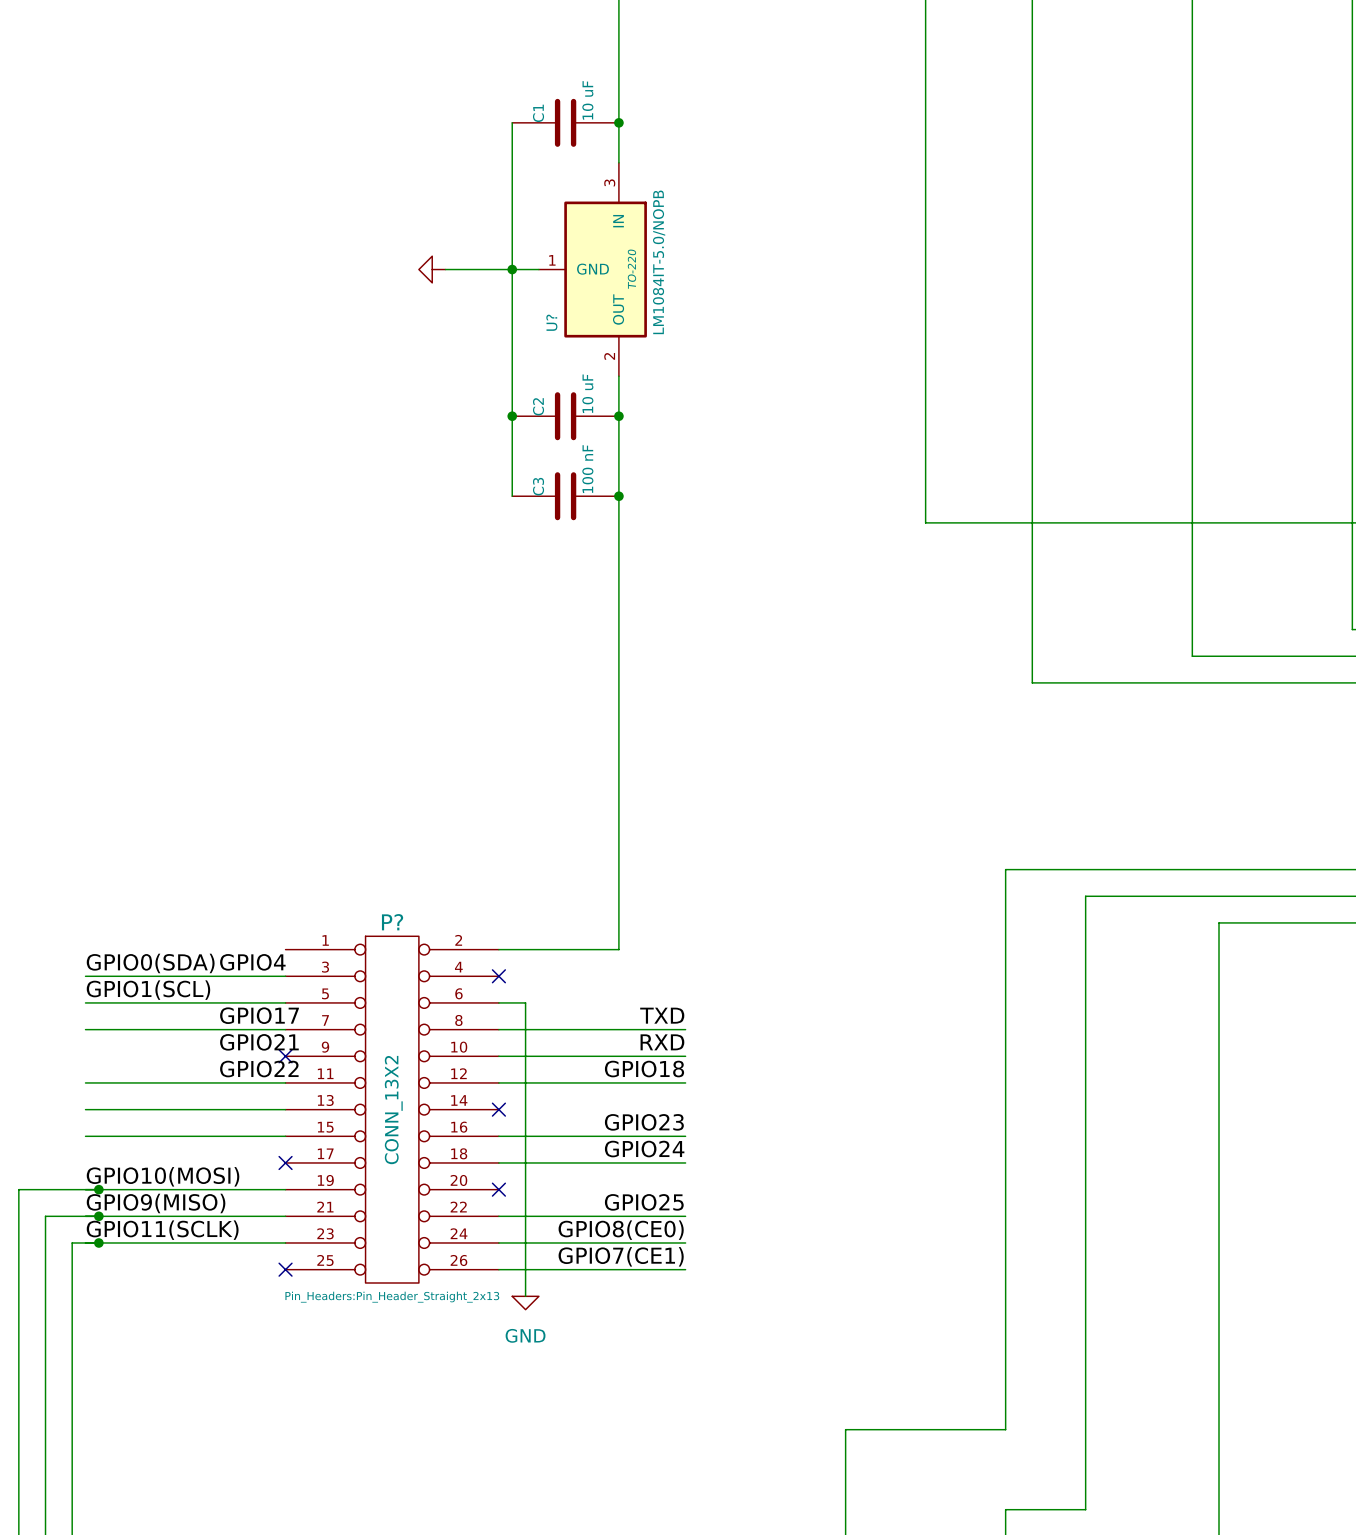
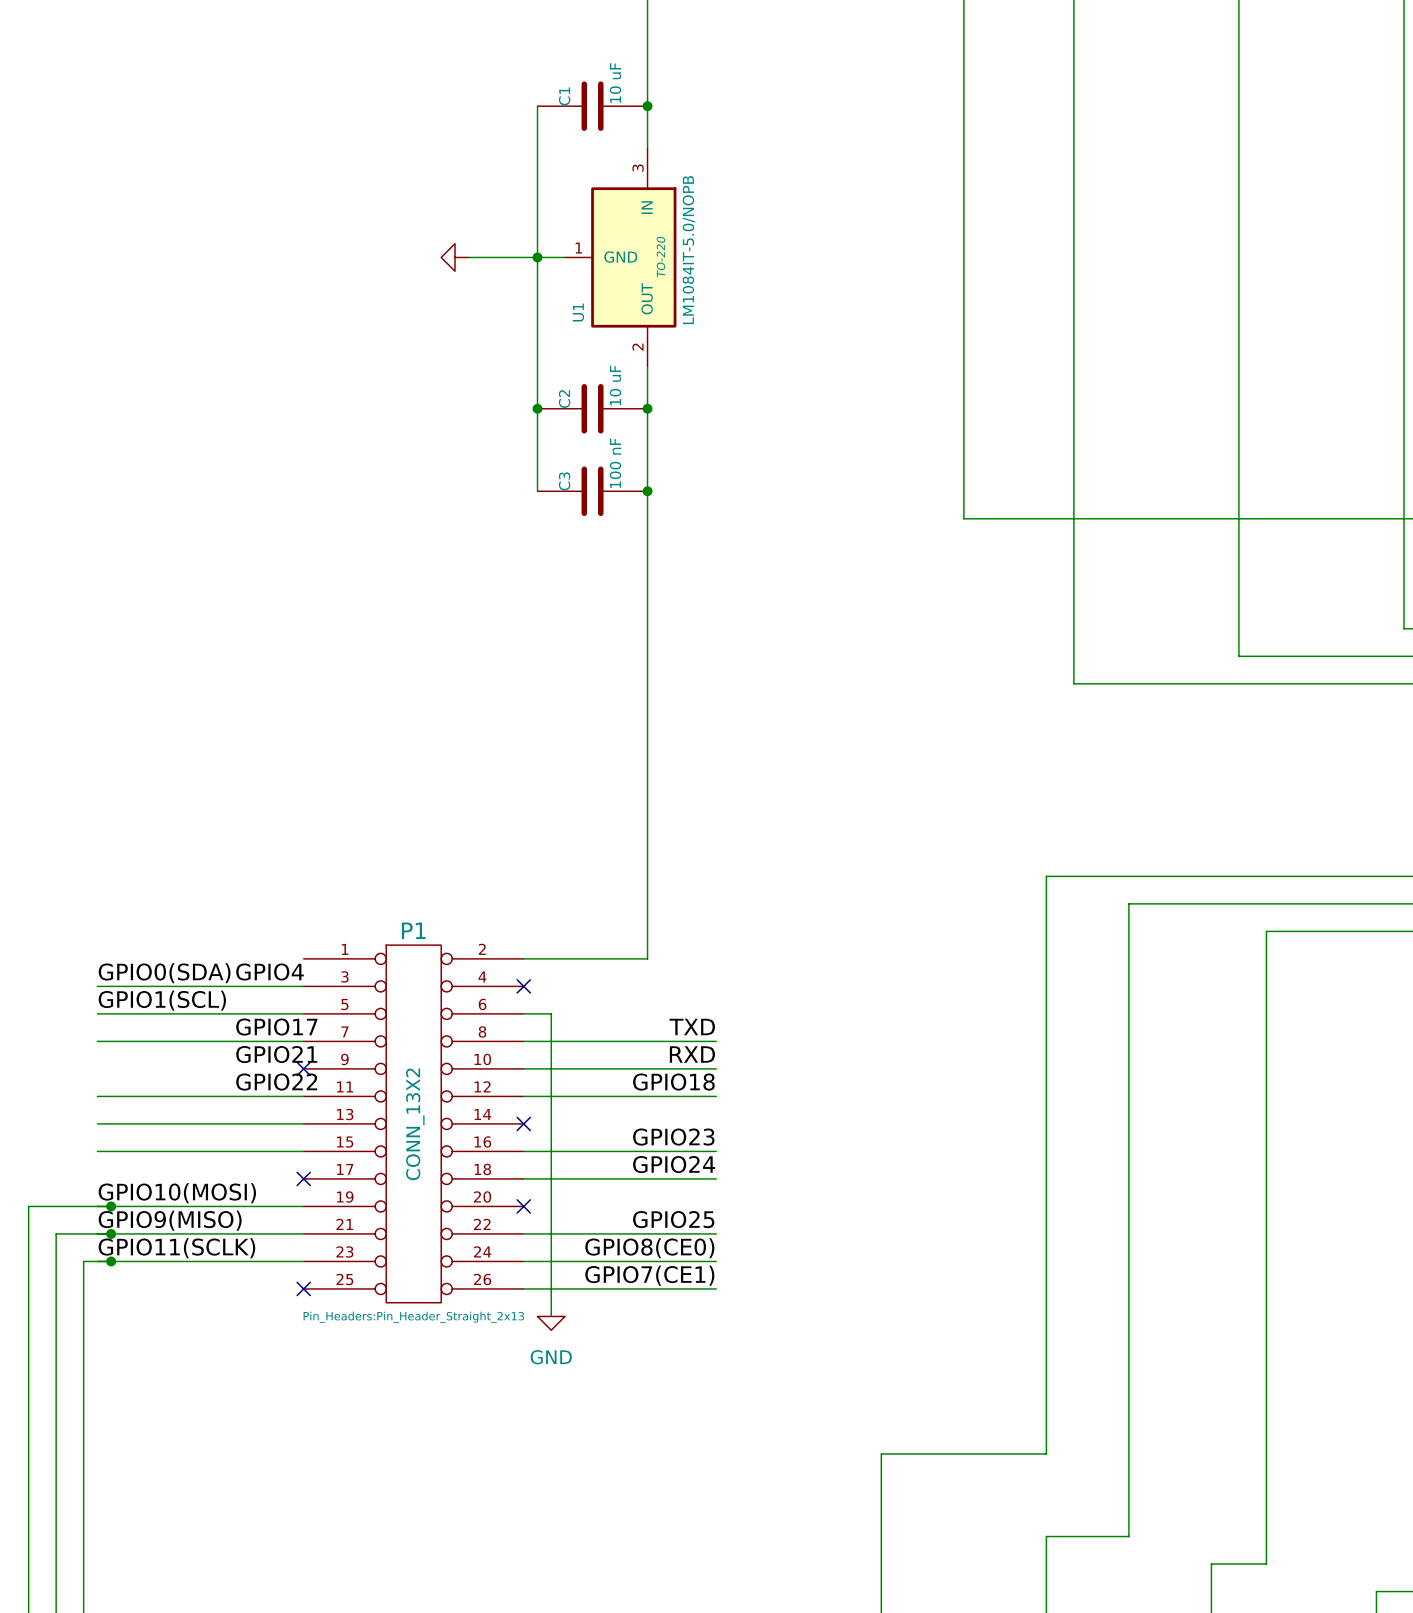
U? name: U? (551, 322) -> U1 (578, 312)
P? name: P? (392, 922) -> P1 (413, 930)

